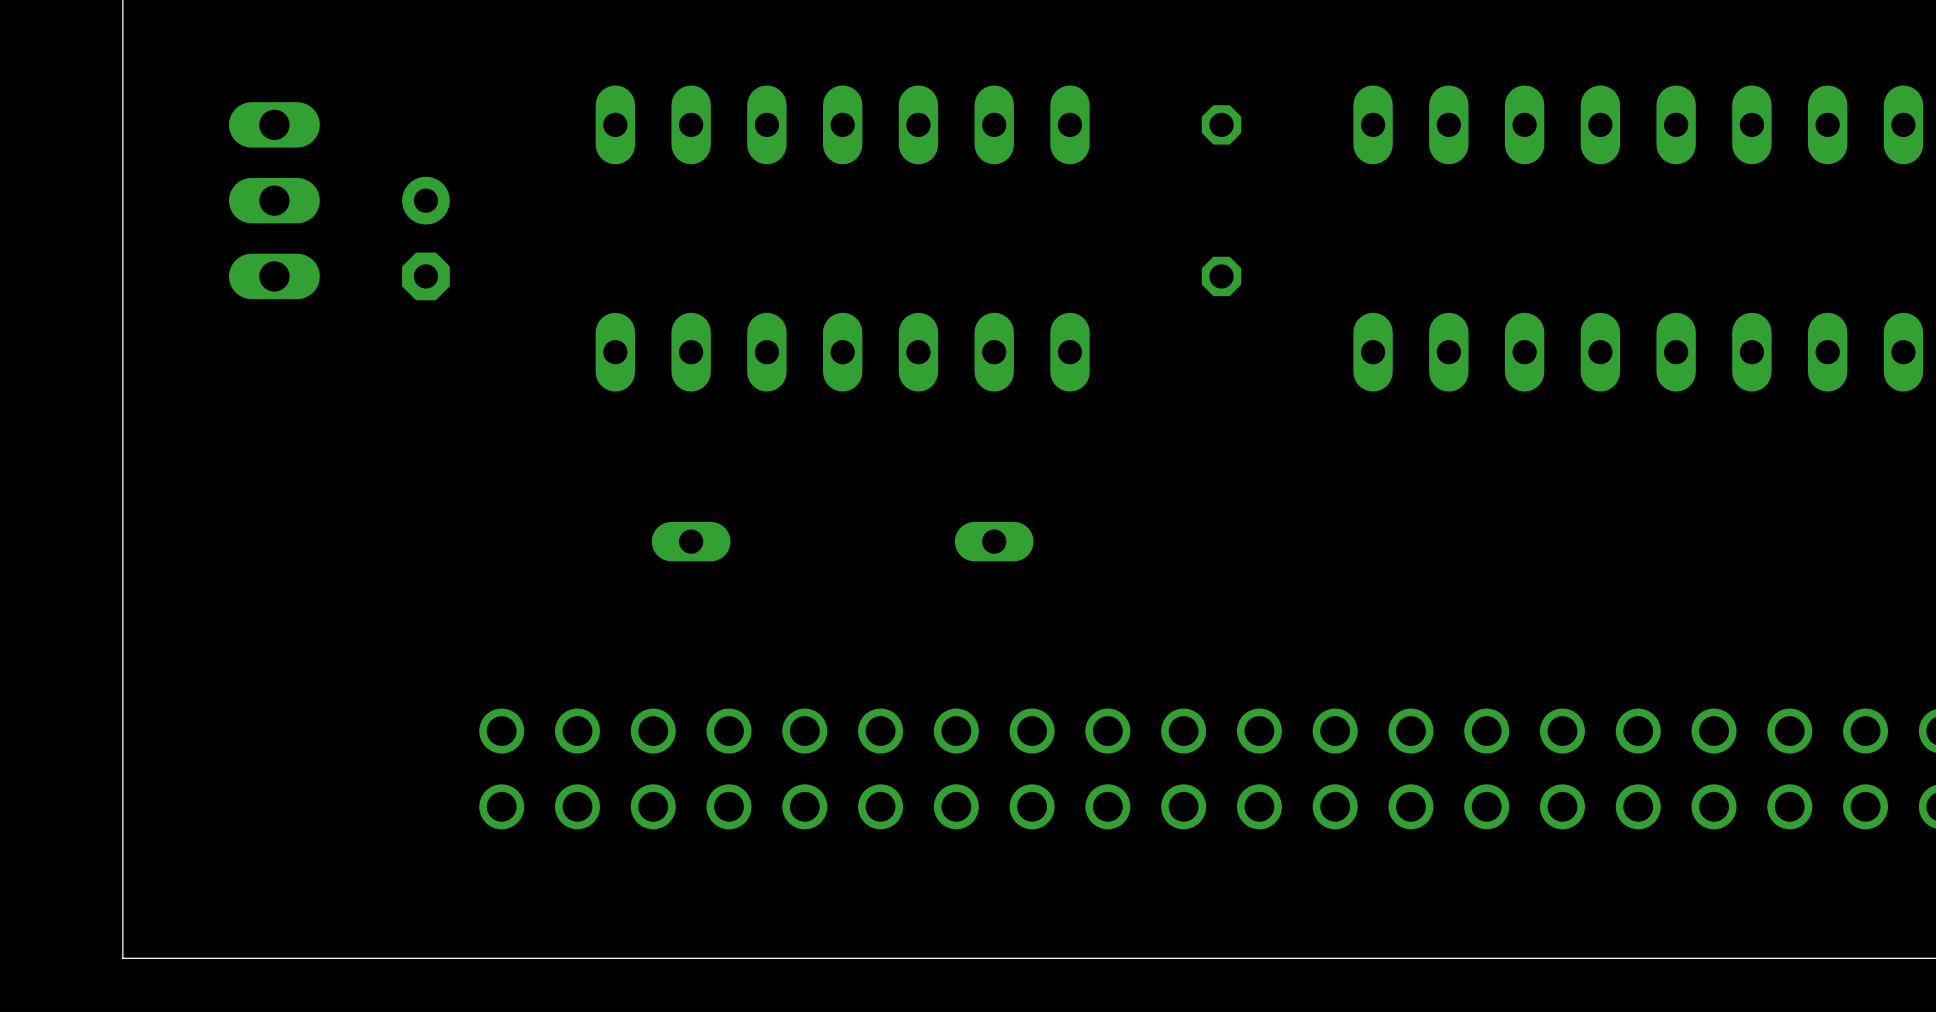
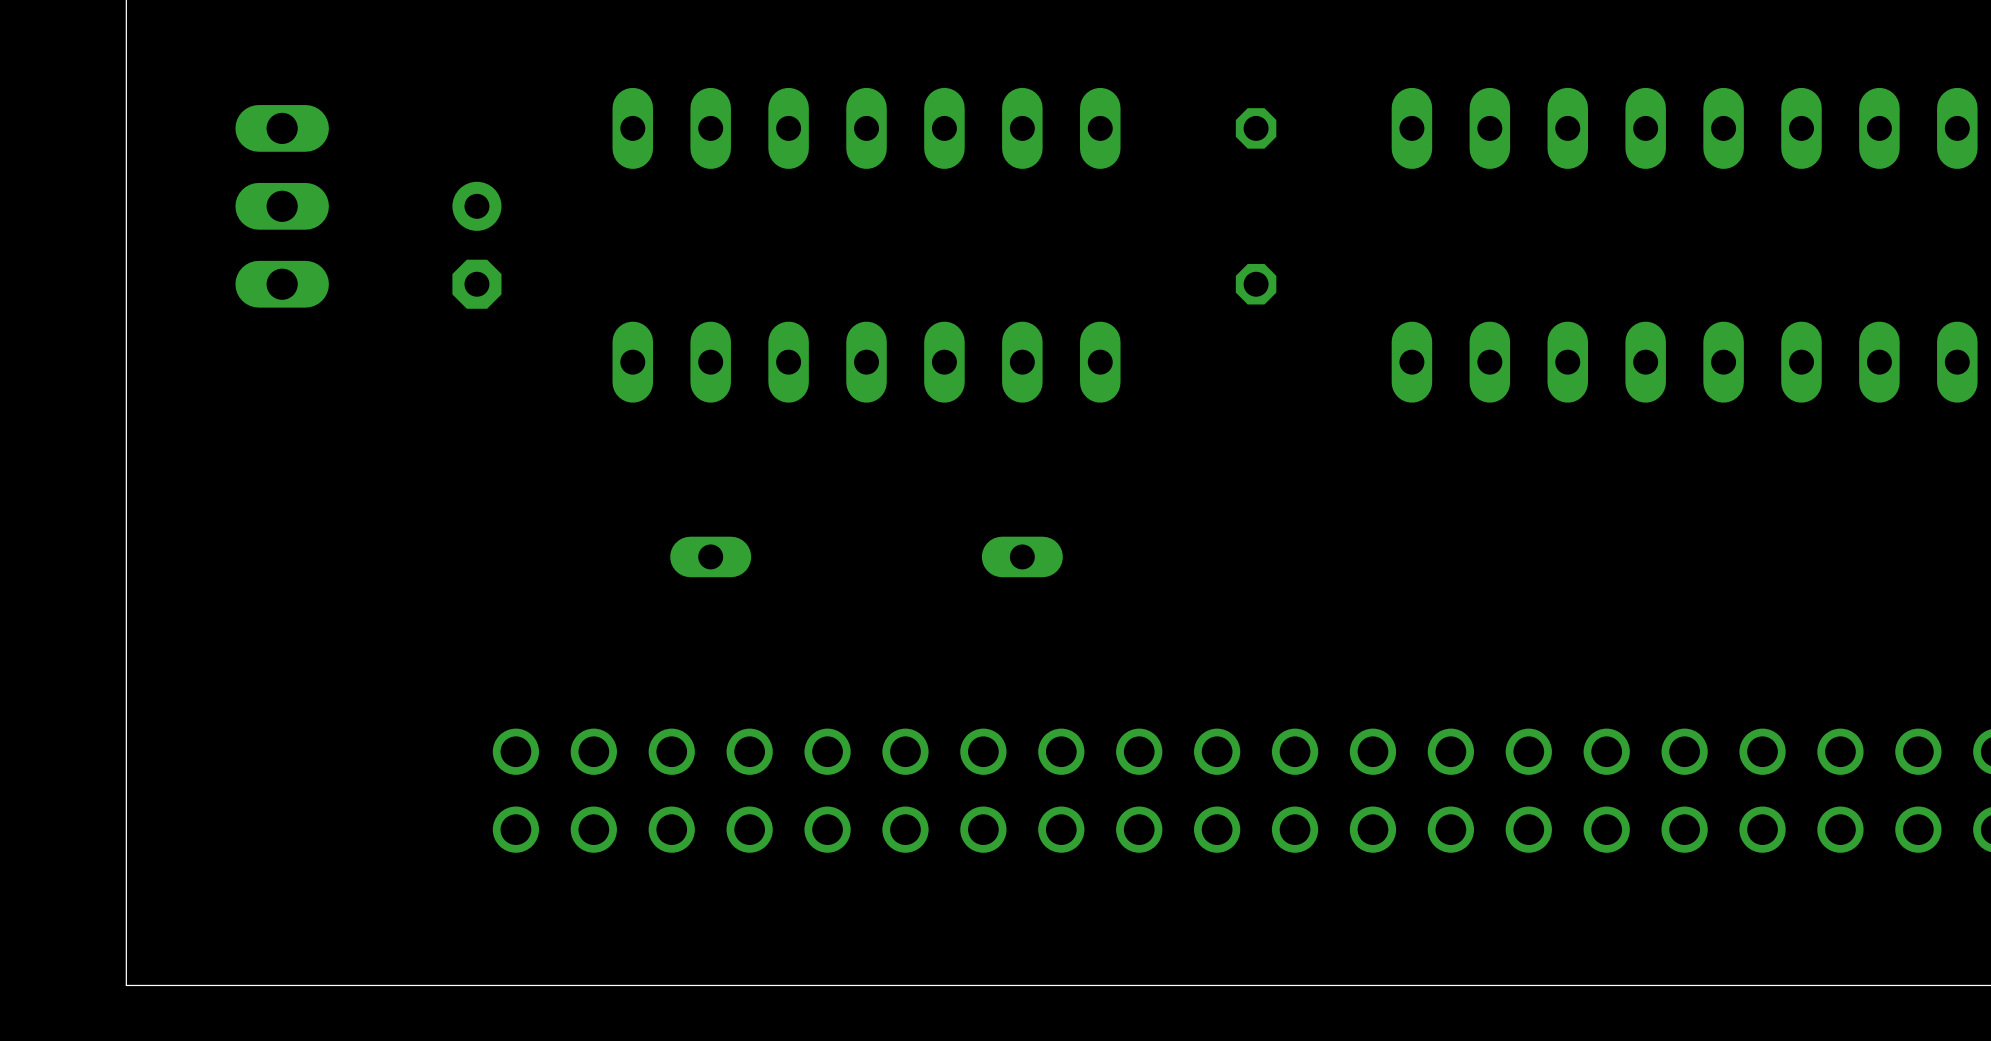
part position: (425, 238) -> (476, 245)

